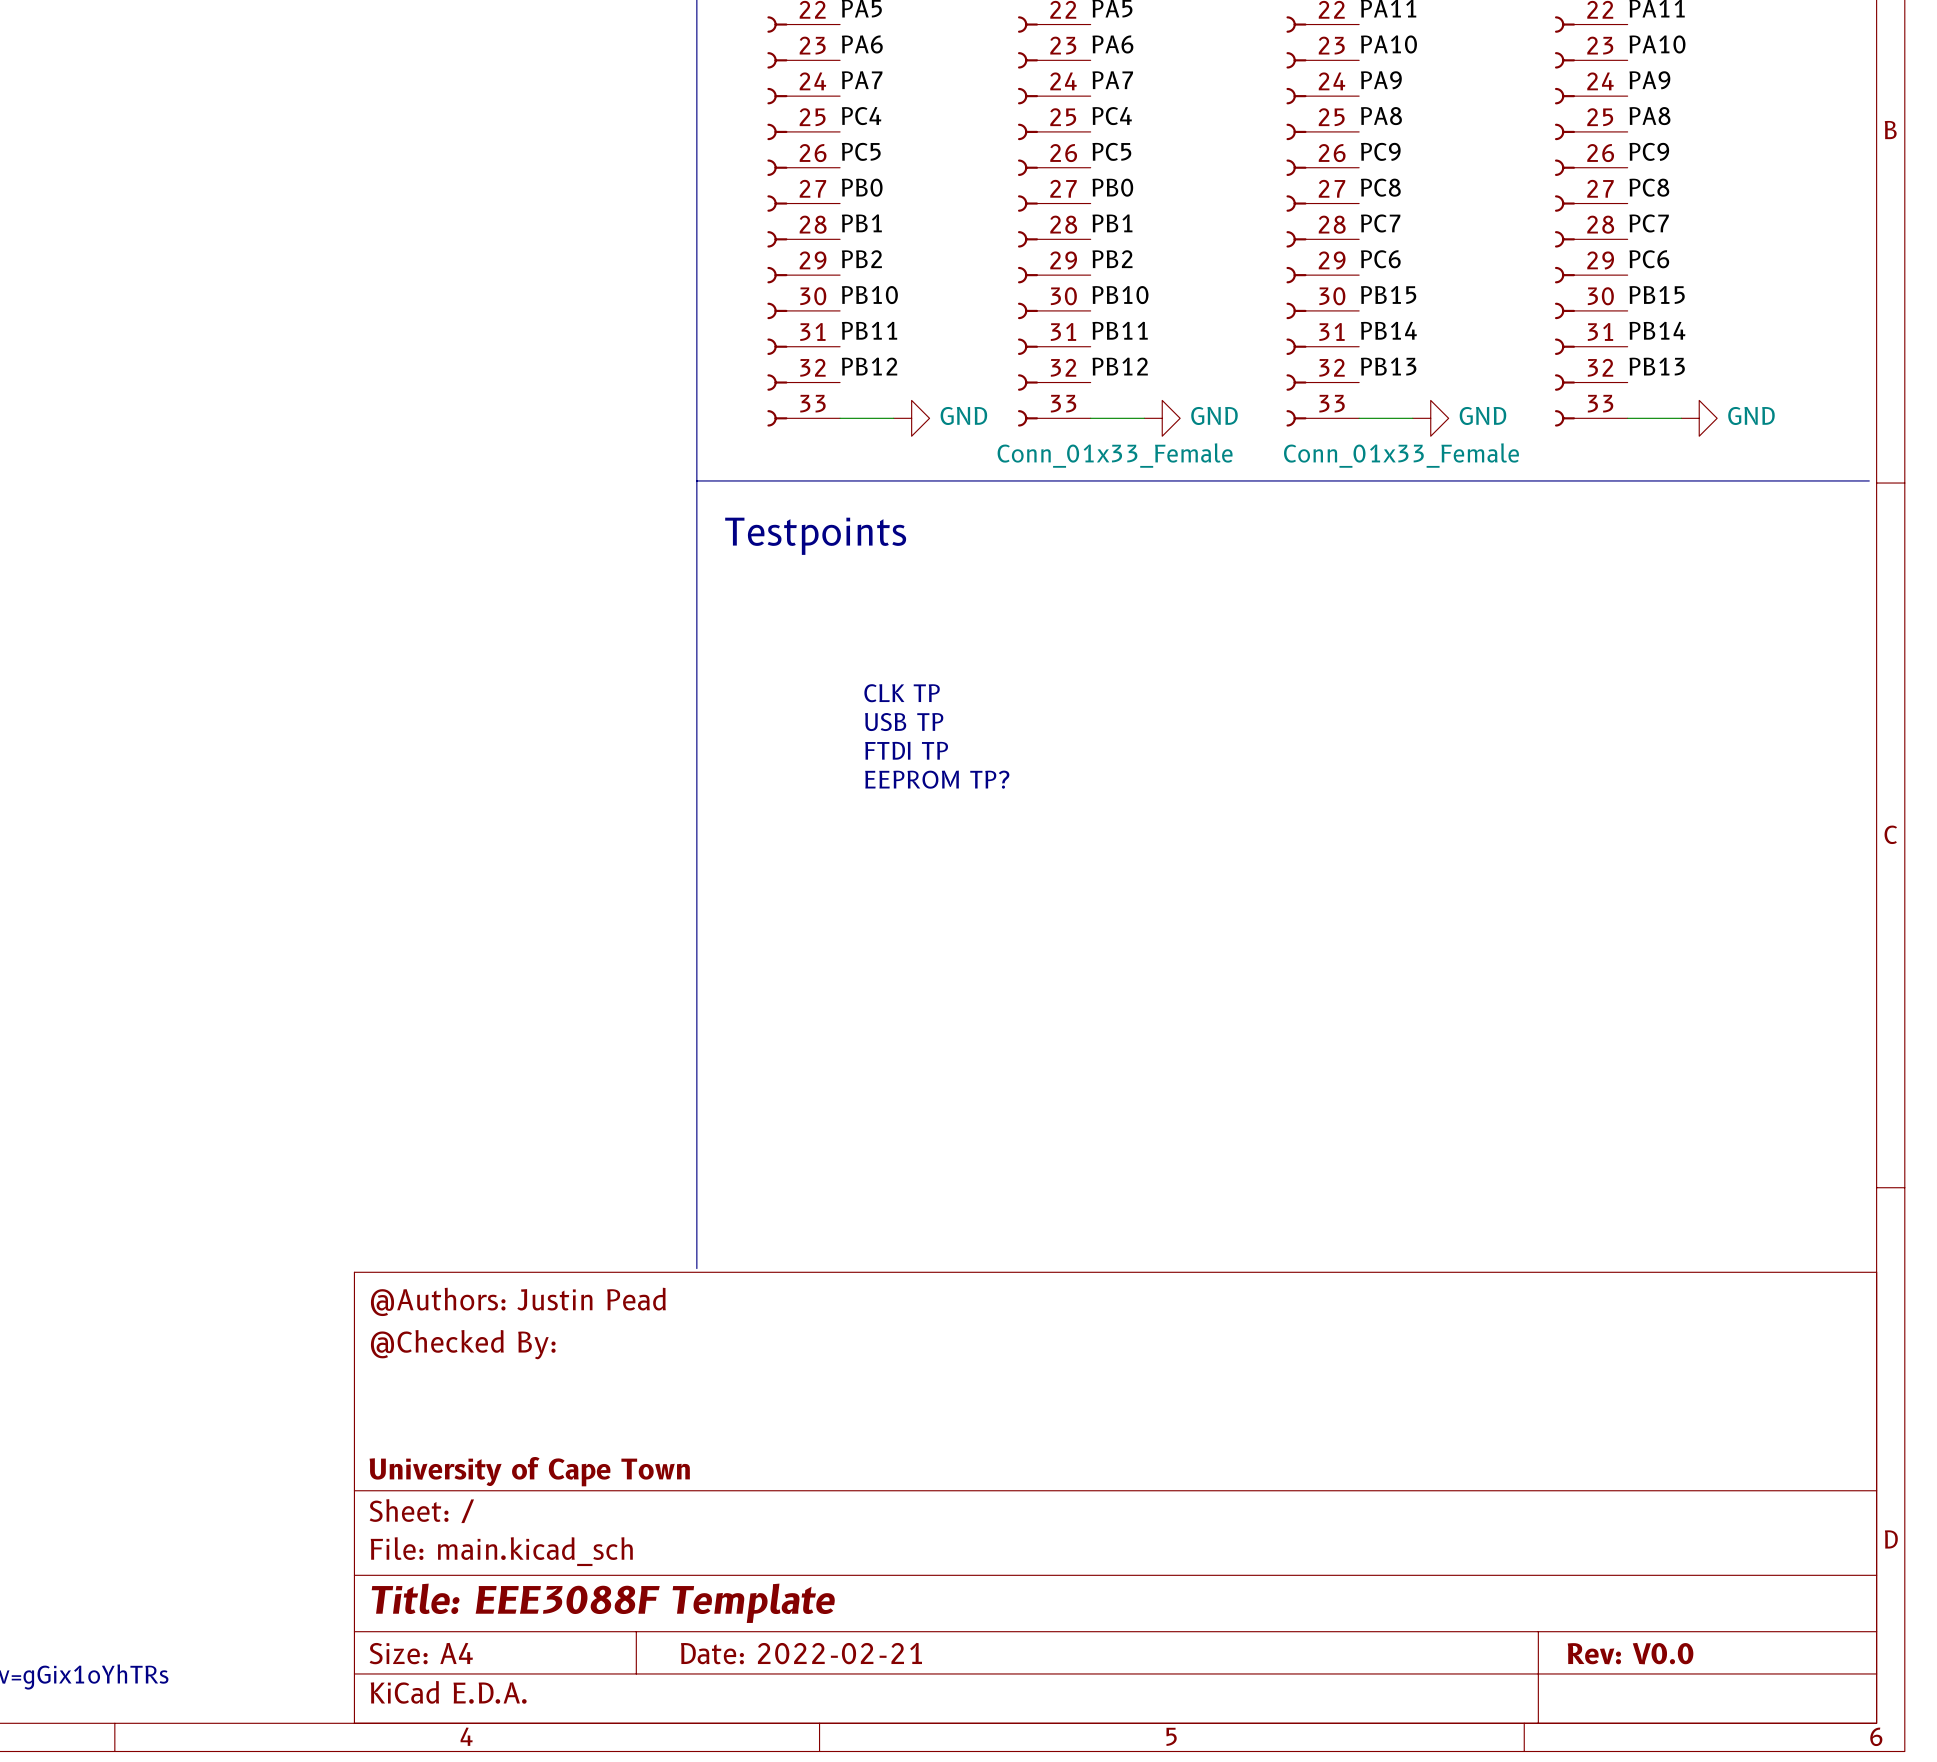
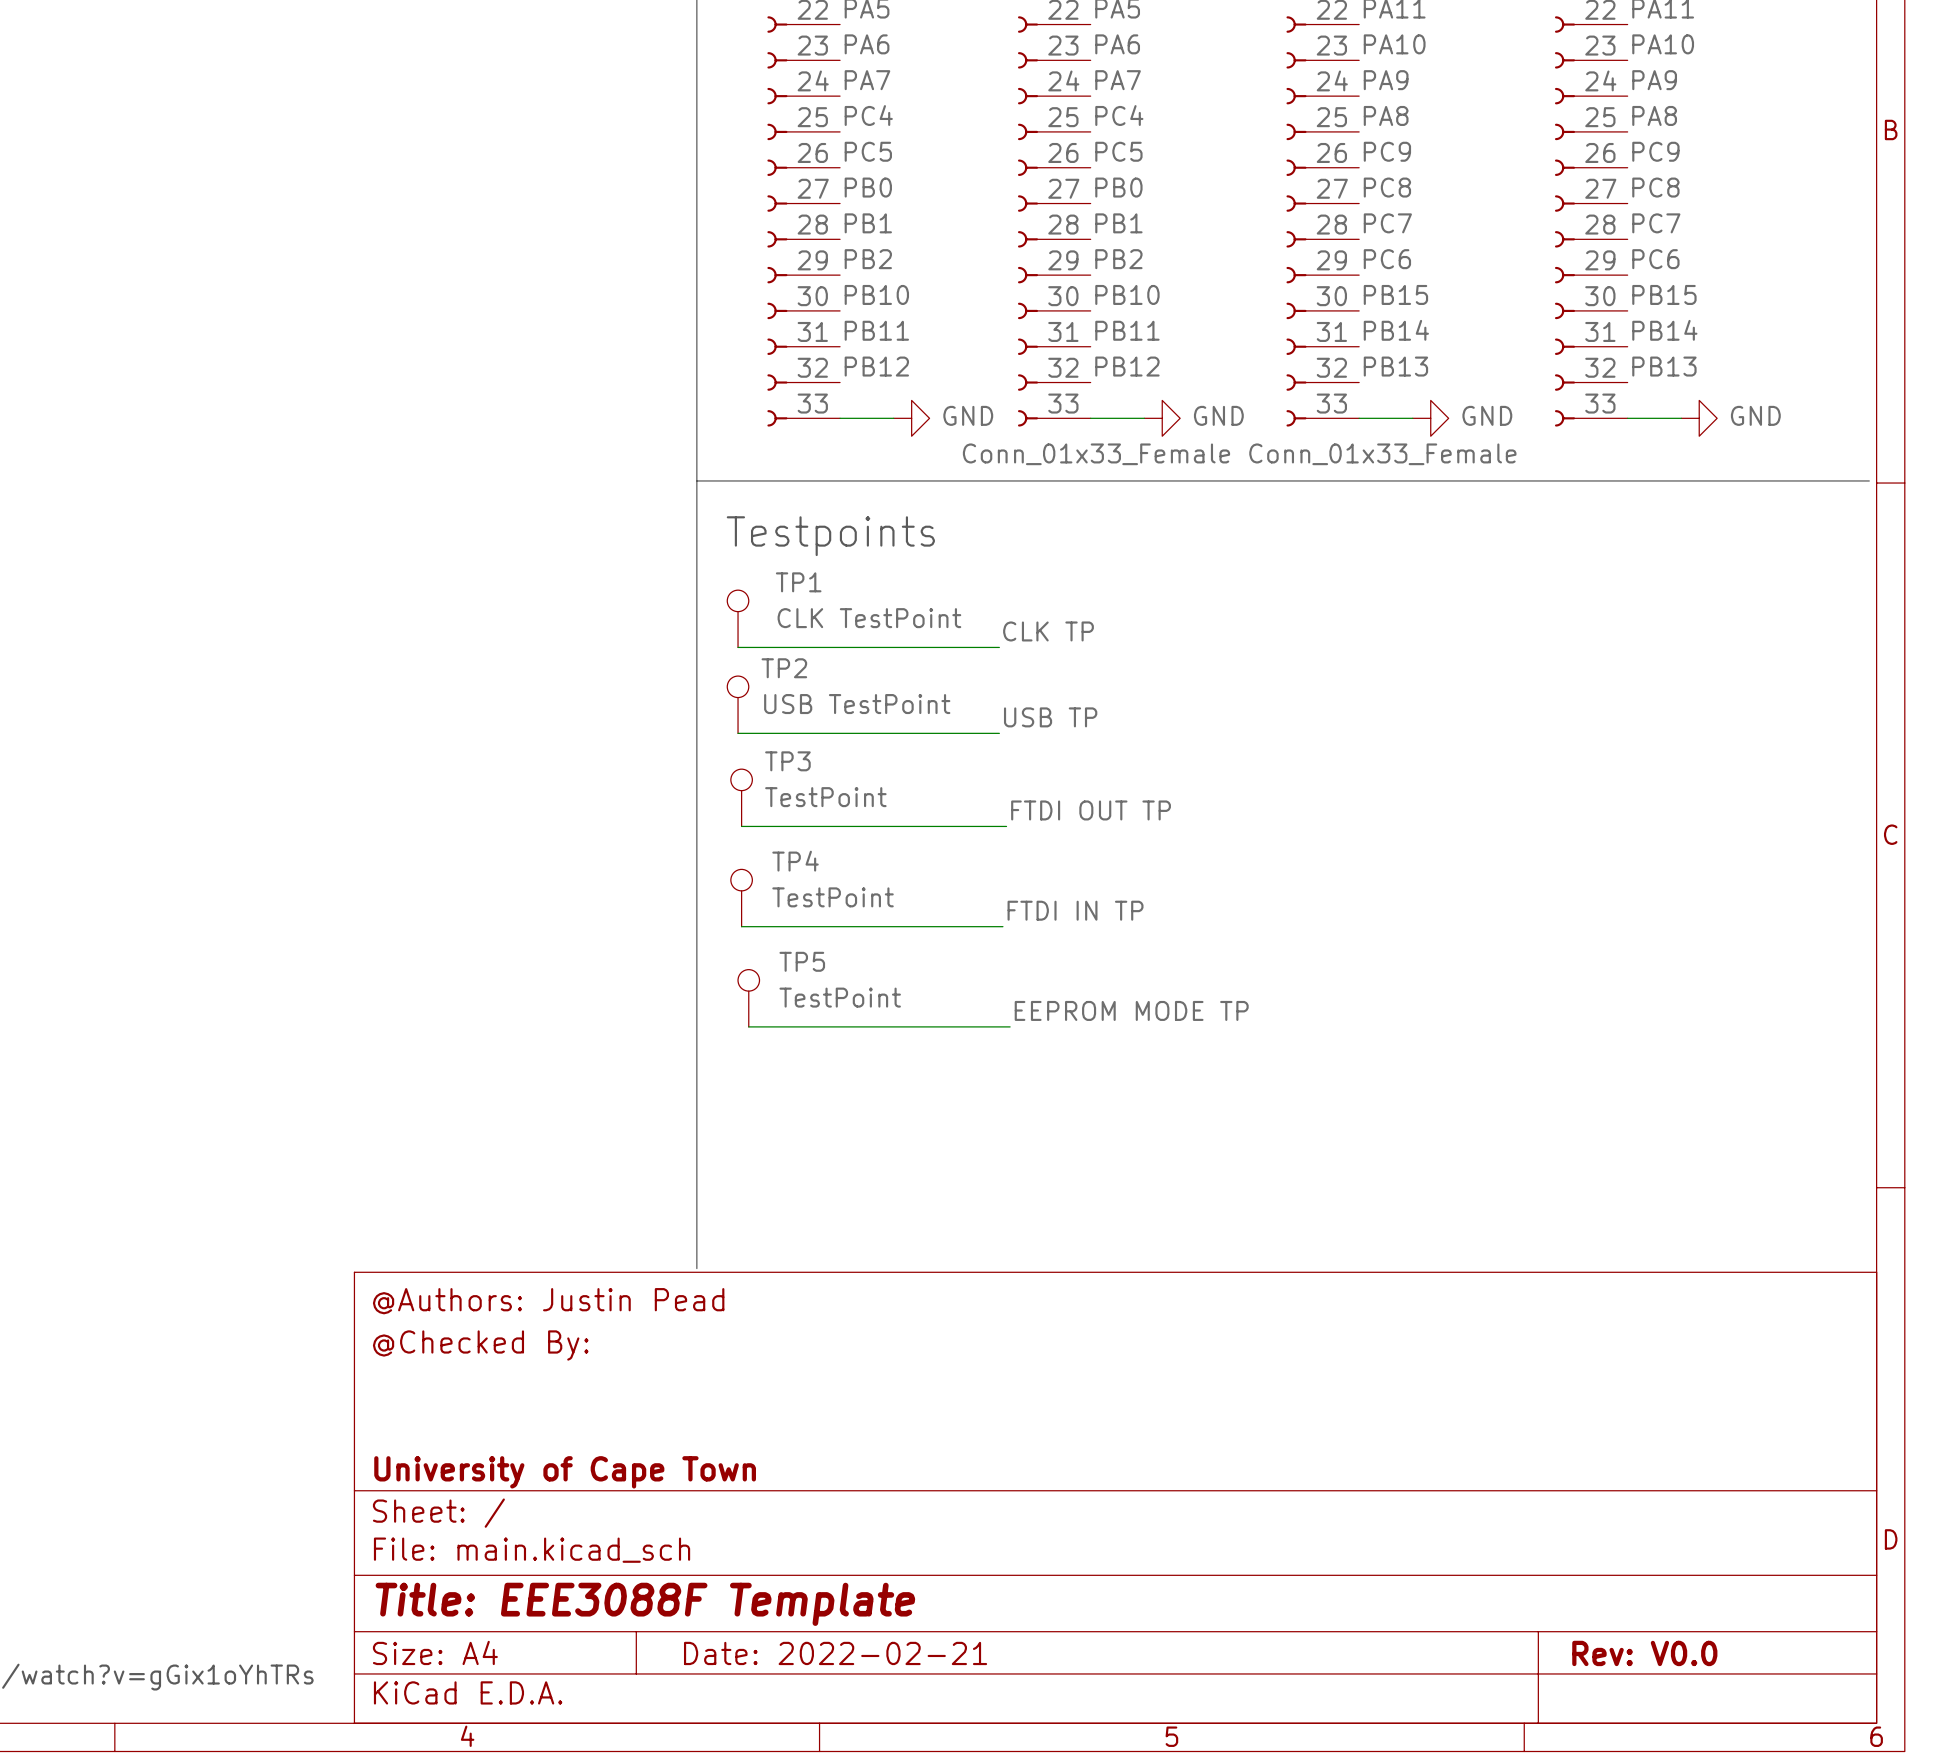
TP1: none -> CLK TestPoint (738, 618)
label: none -> CLK TP (1048, 631)
wire: none -> (738, 647) (999, 647)
text: CLK TP (902, 693) -> none
TP2: none -> USB TestPoint (738, 704)
label: none -> USB TP (1050, 717)
text: USB TP (904, 722) -> none
wire: none -> (738, 733) (999, 733)
text: FTDI TP (906, 750) -> none
text: EEPROM TP? (937, 779) -> none
TP3: none -> TestPoint (741, 797)
label: none -> FTDI OUT TP (1091, 810)
wire: none -> (741, 826) (1006, 826)
TP4: none -> TestPoint (741, 898)
label: none -> FTDI IN TP (1075, 910)
wire: none -> (741, 926) (1002, 926)
TP5: none -> TestPoint (748, 998)
label: none -> EEPROM MODE TP (1131, 1010)
wire: none -> (748, 1026) (1010, 1026)

